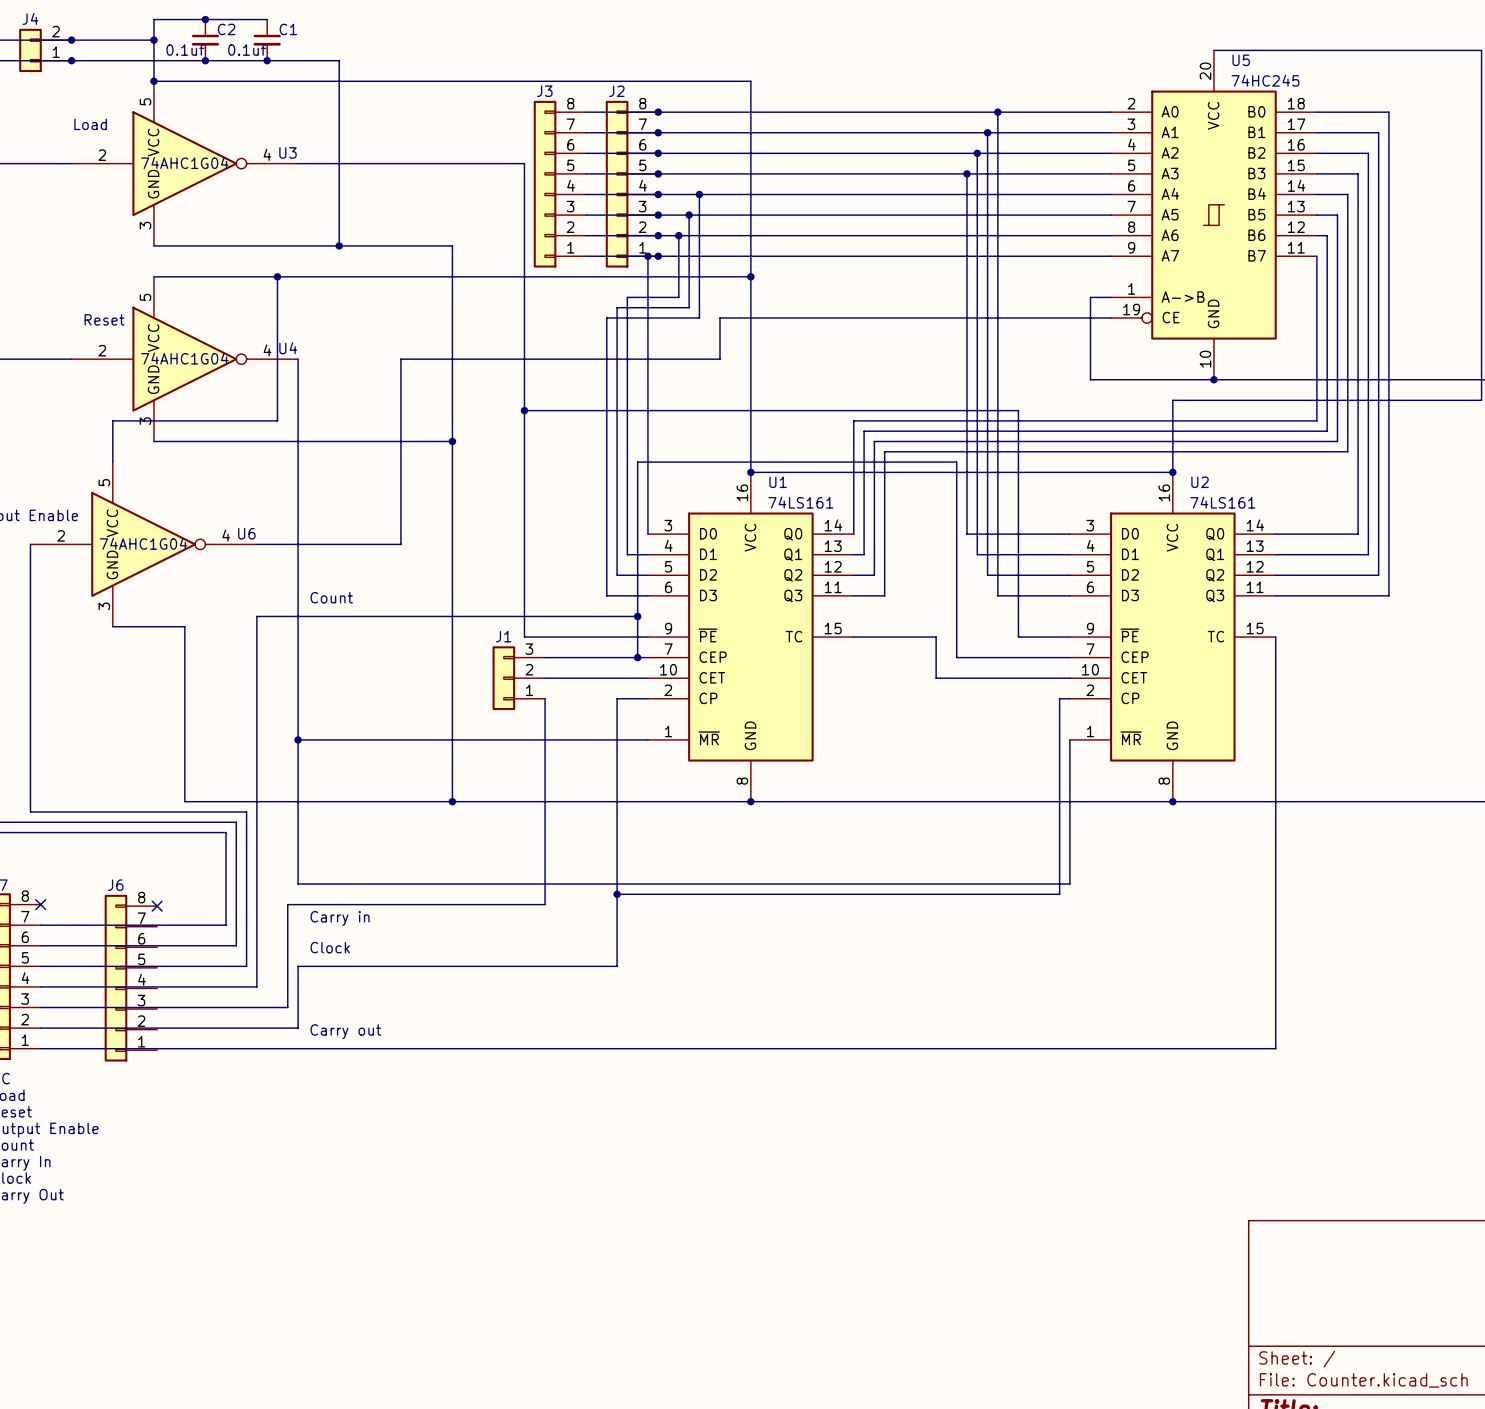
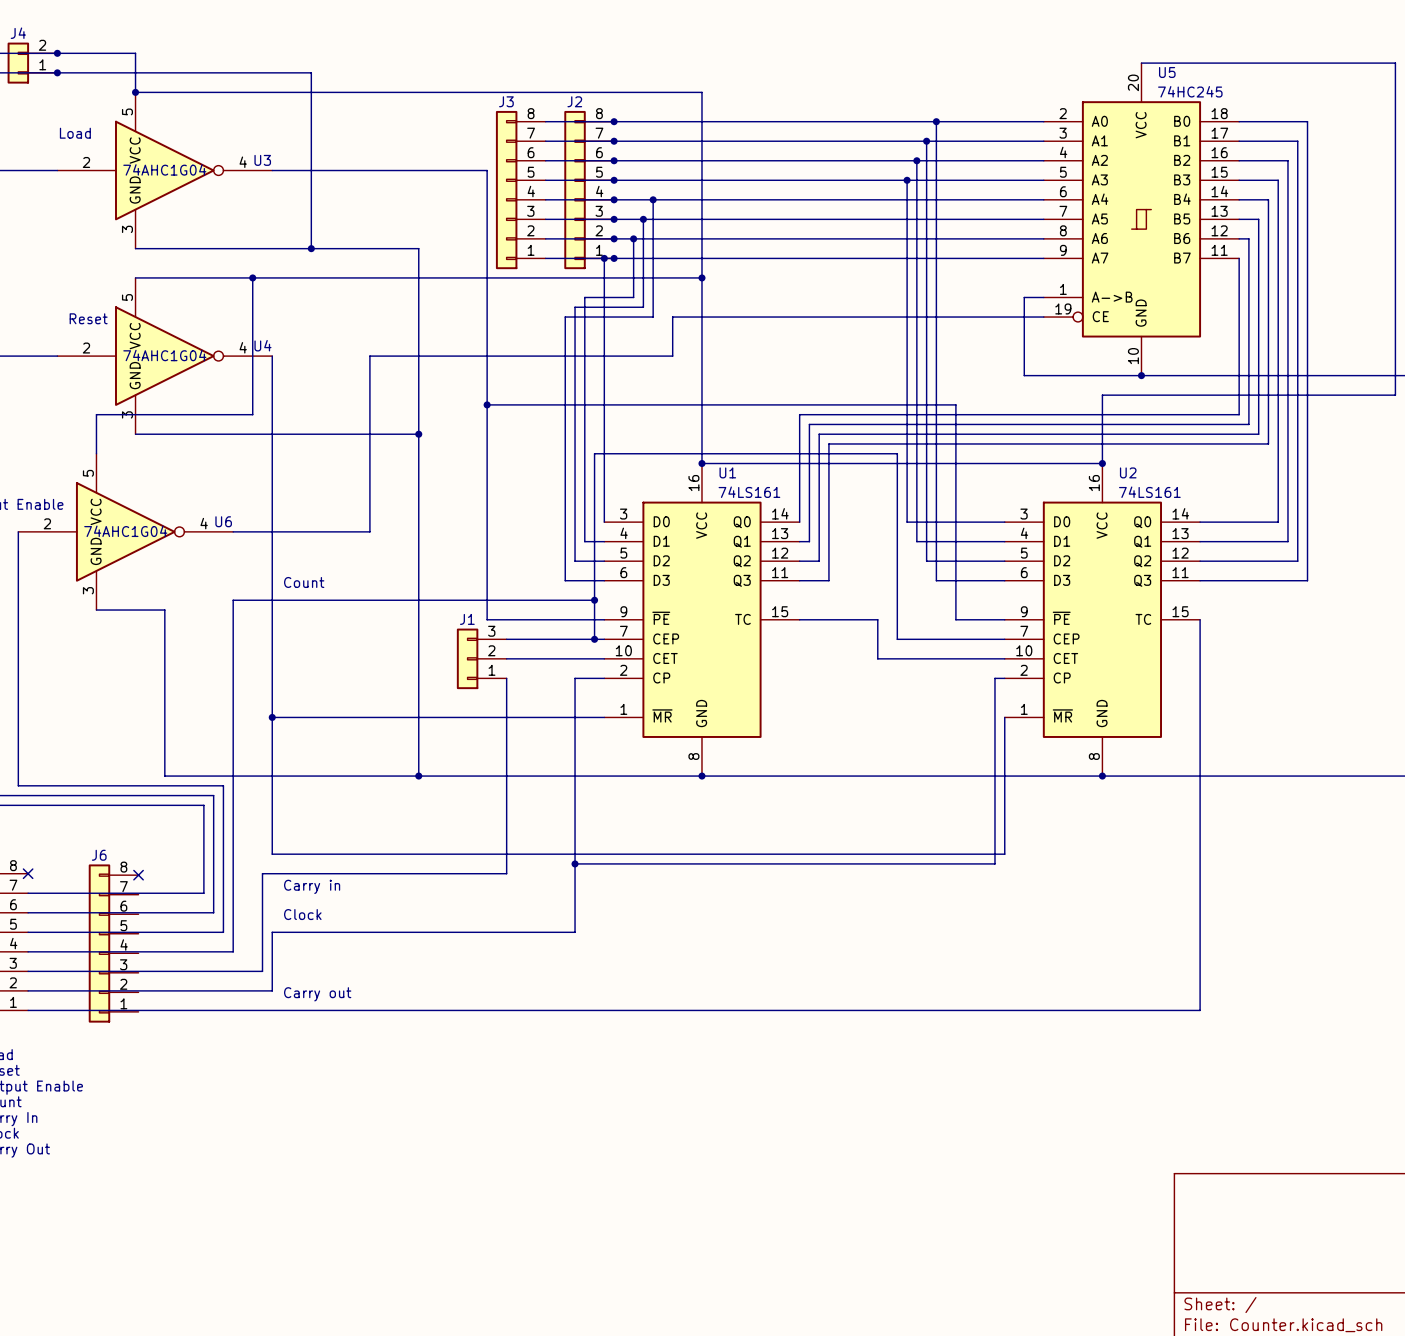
junction: (205, 19) -> none
wire: (267, 19) (153, 19) (153, 40) -> none
junction: (153, 40) -> none
C2: 0.1uf (205, 40) -> none
C1: 0.1uf (267, 40) -> none
junction: (205, 60) -> none
junction: (267, 60) -> none

